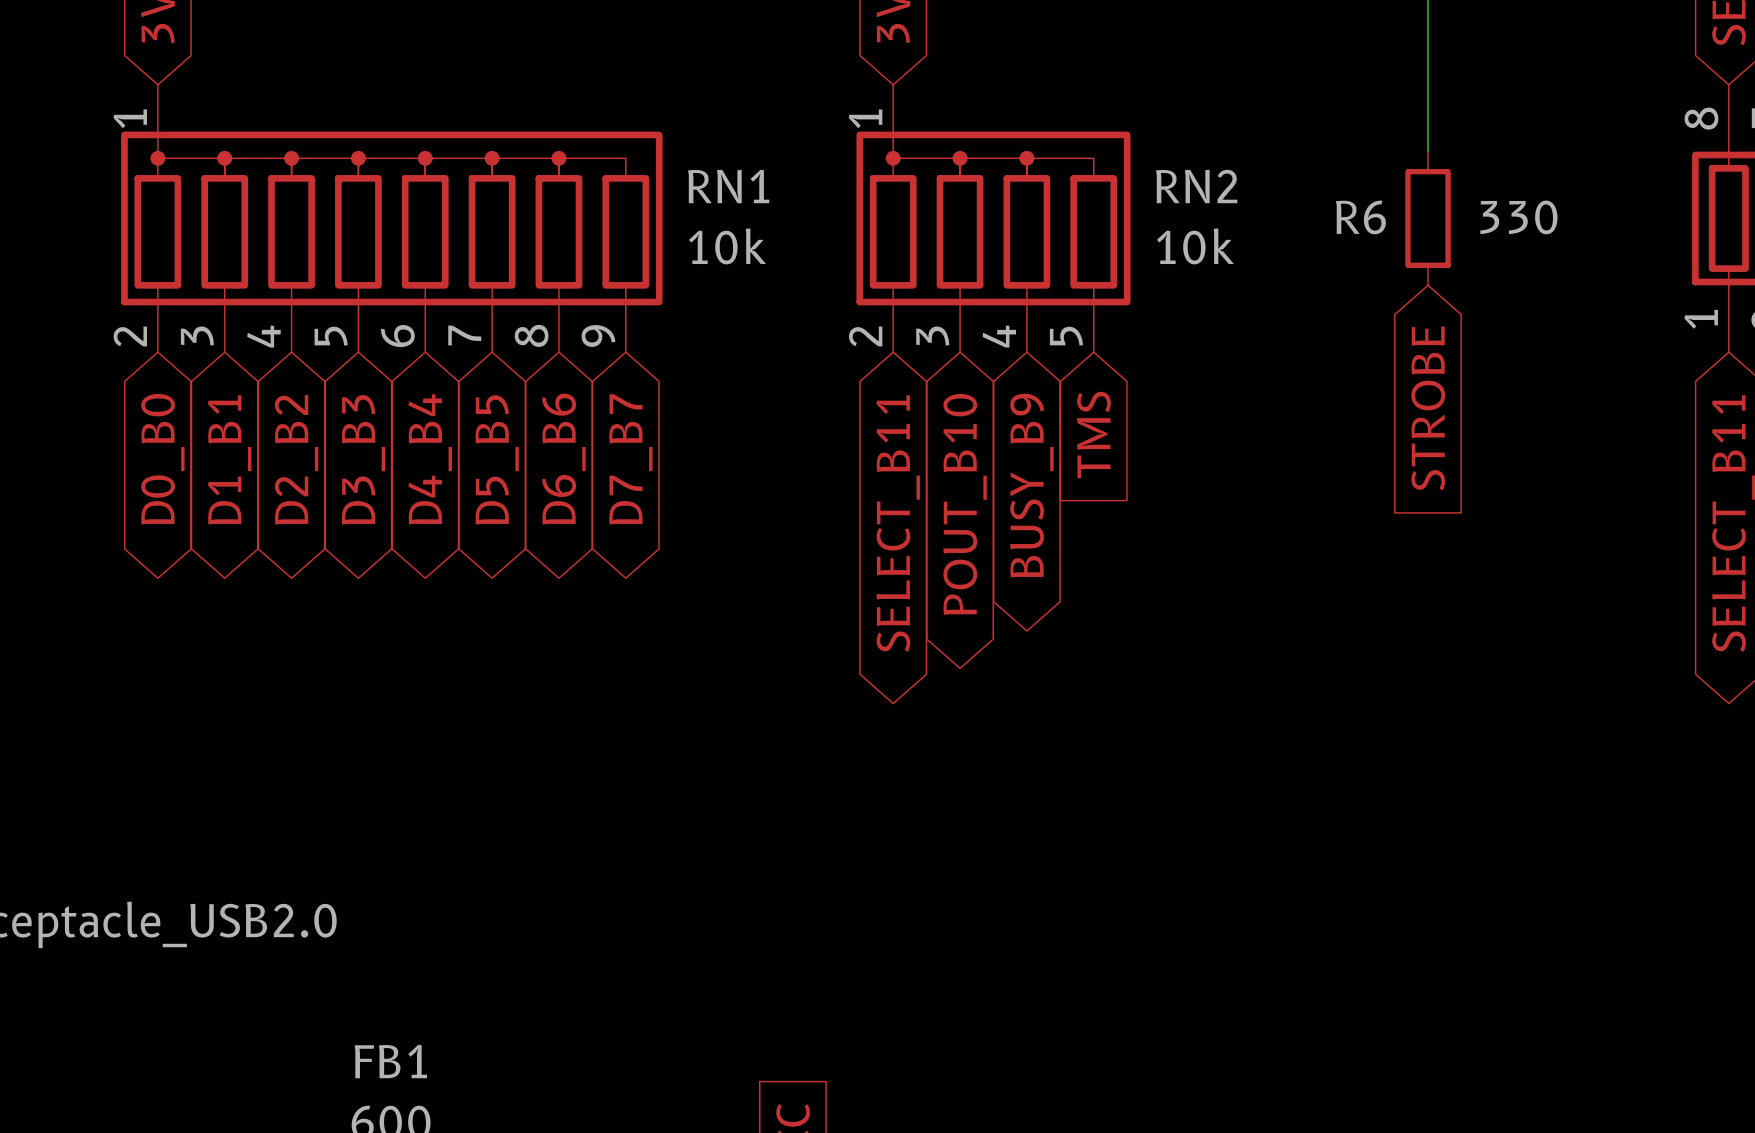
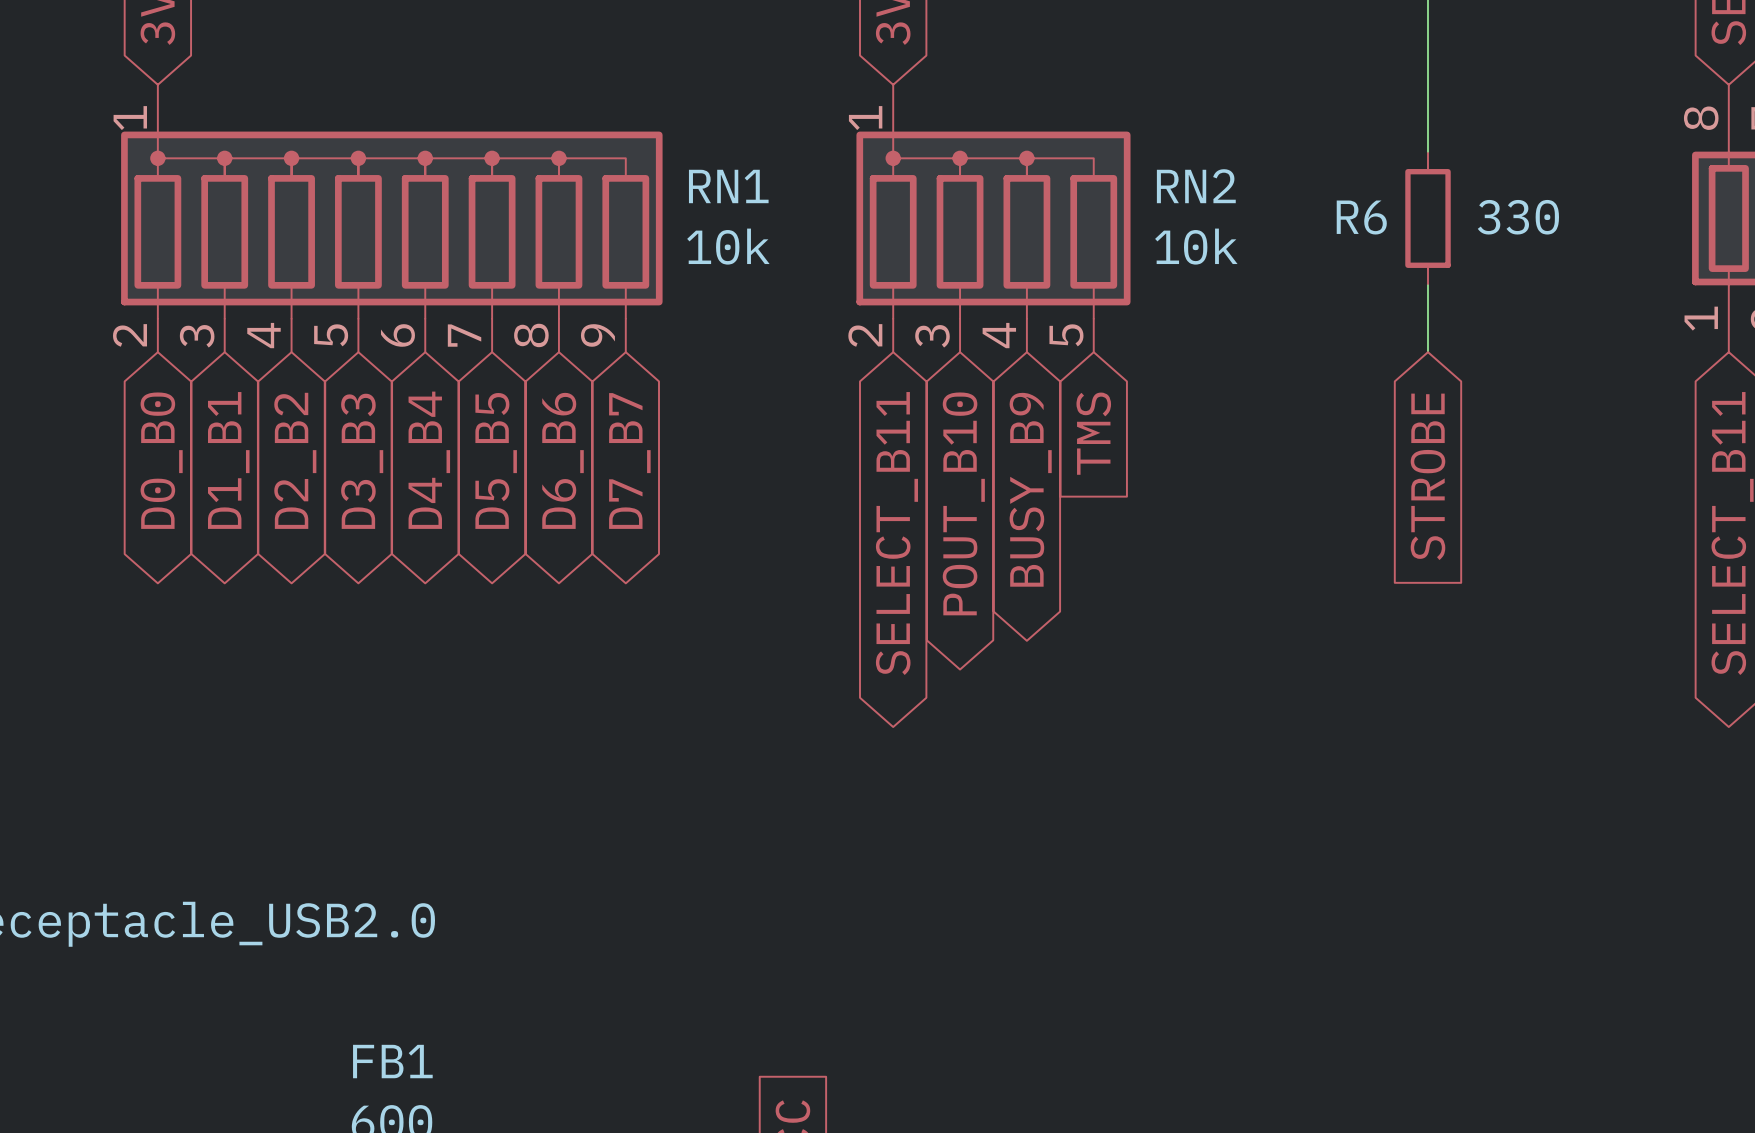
wire: none -> (1427, 285) (1427, 352)
global label position: STROBE (1428, 408) -> STROBE (1427, 476)

